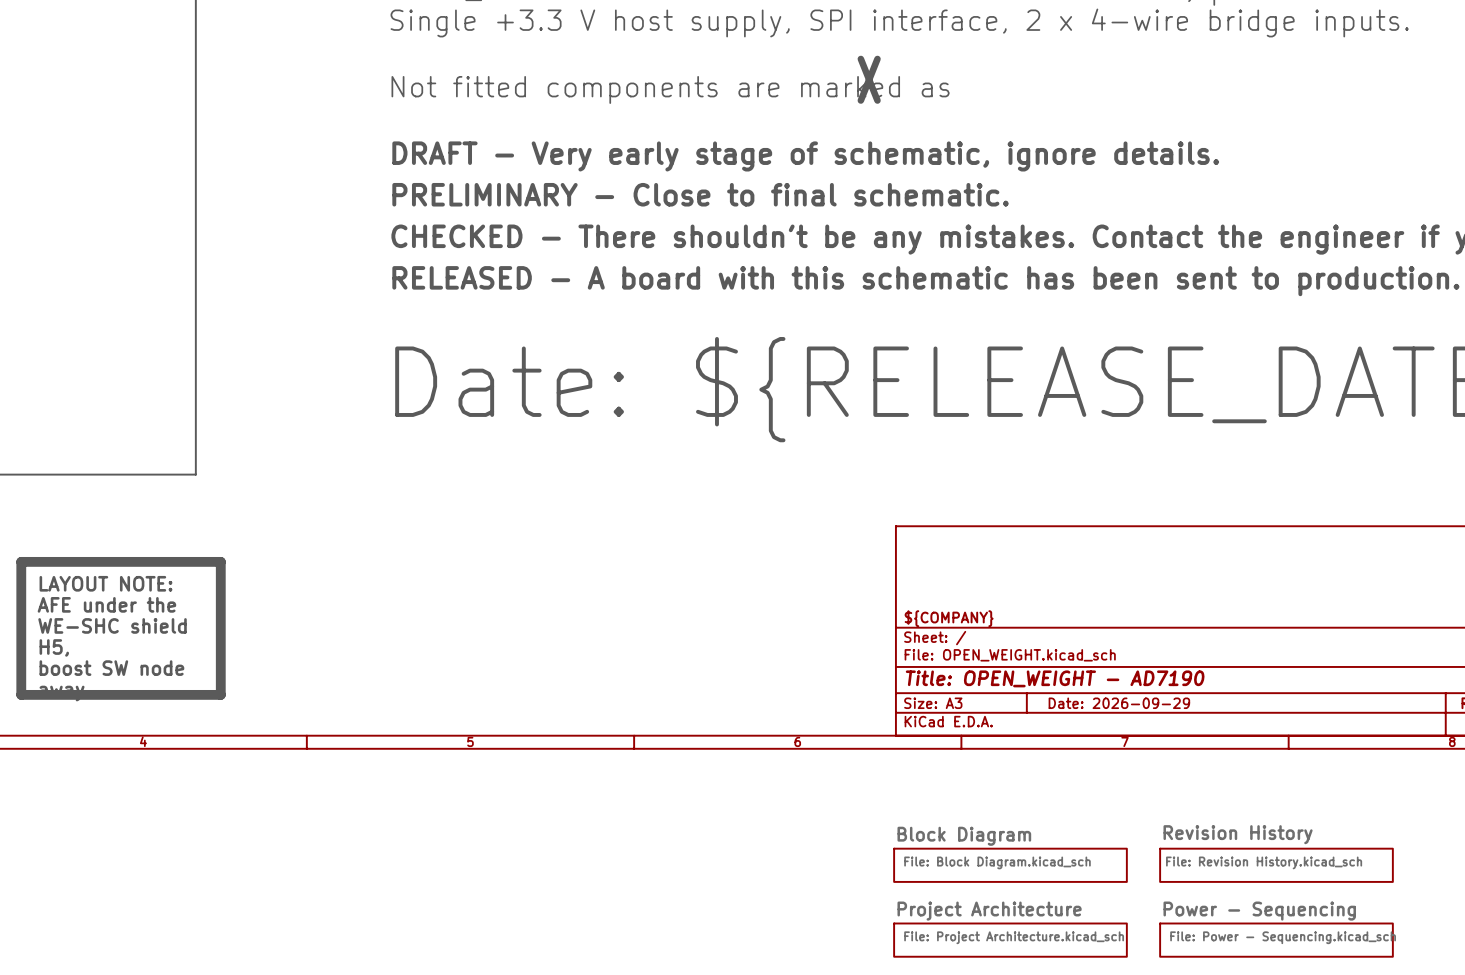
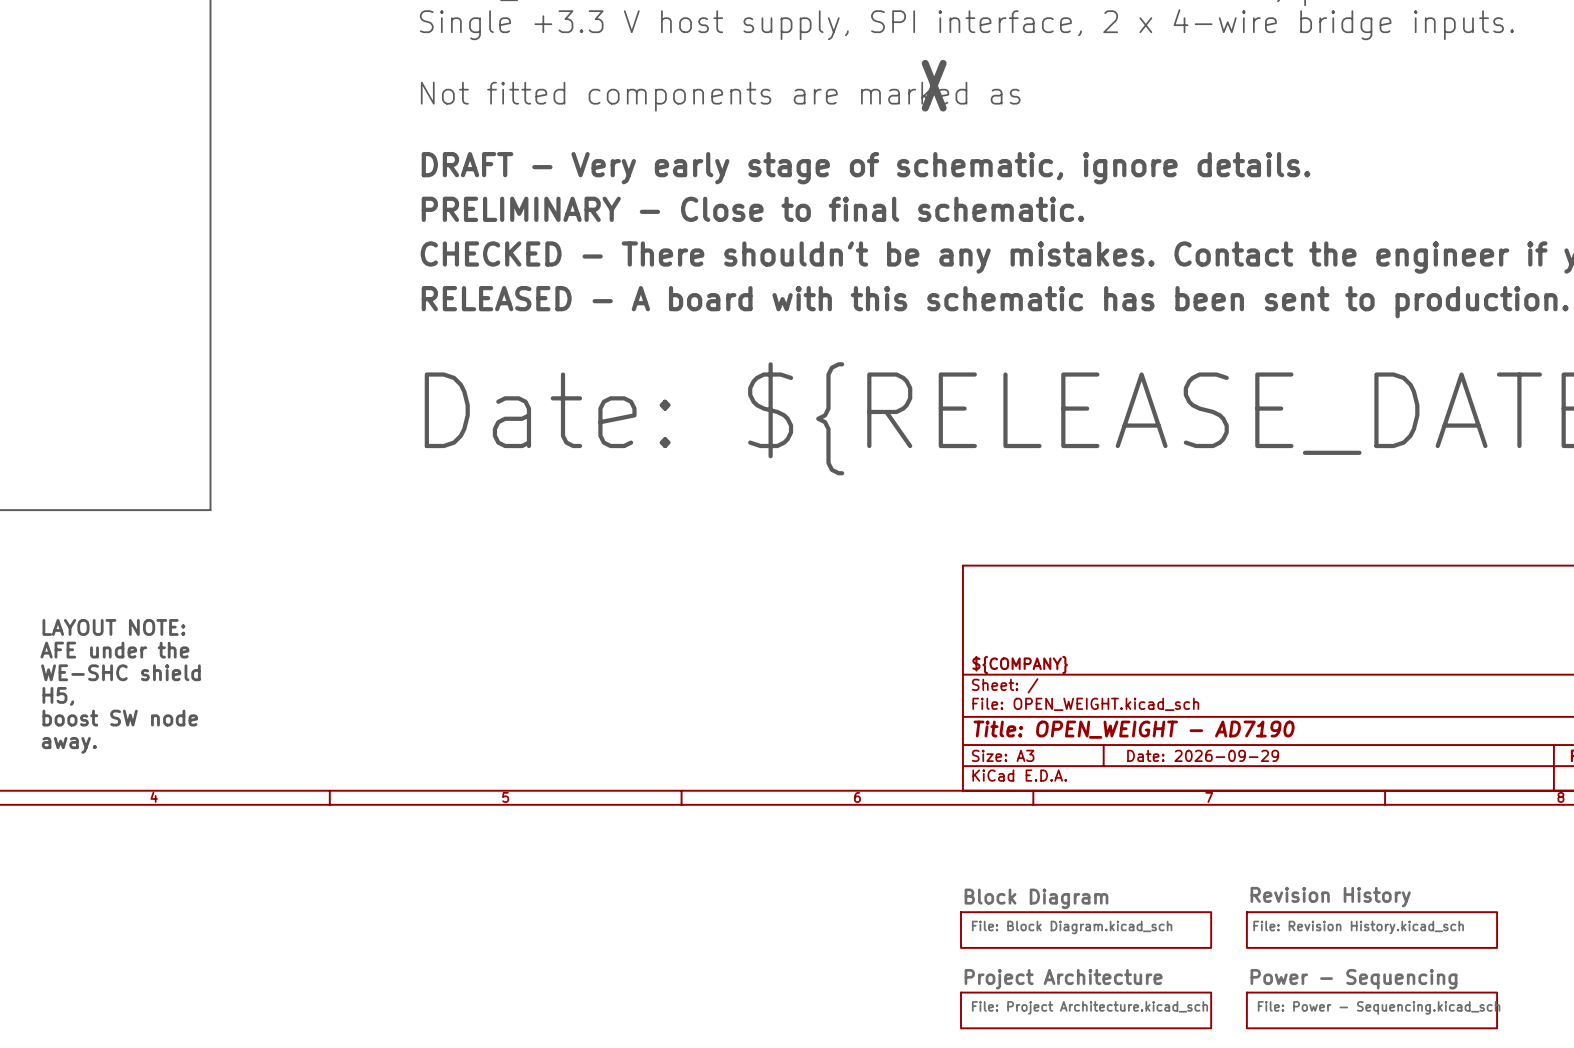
line: (21, 561) (220, 561) (220, 694) (21, 694) (21, 561) -> none

